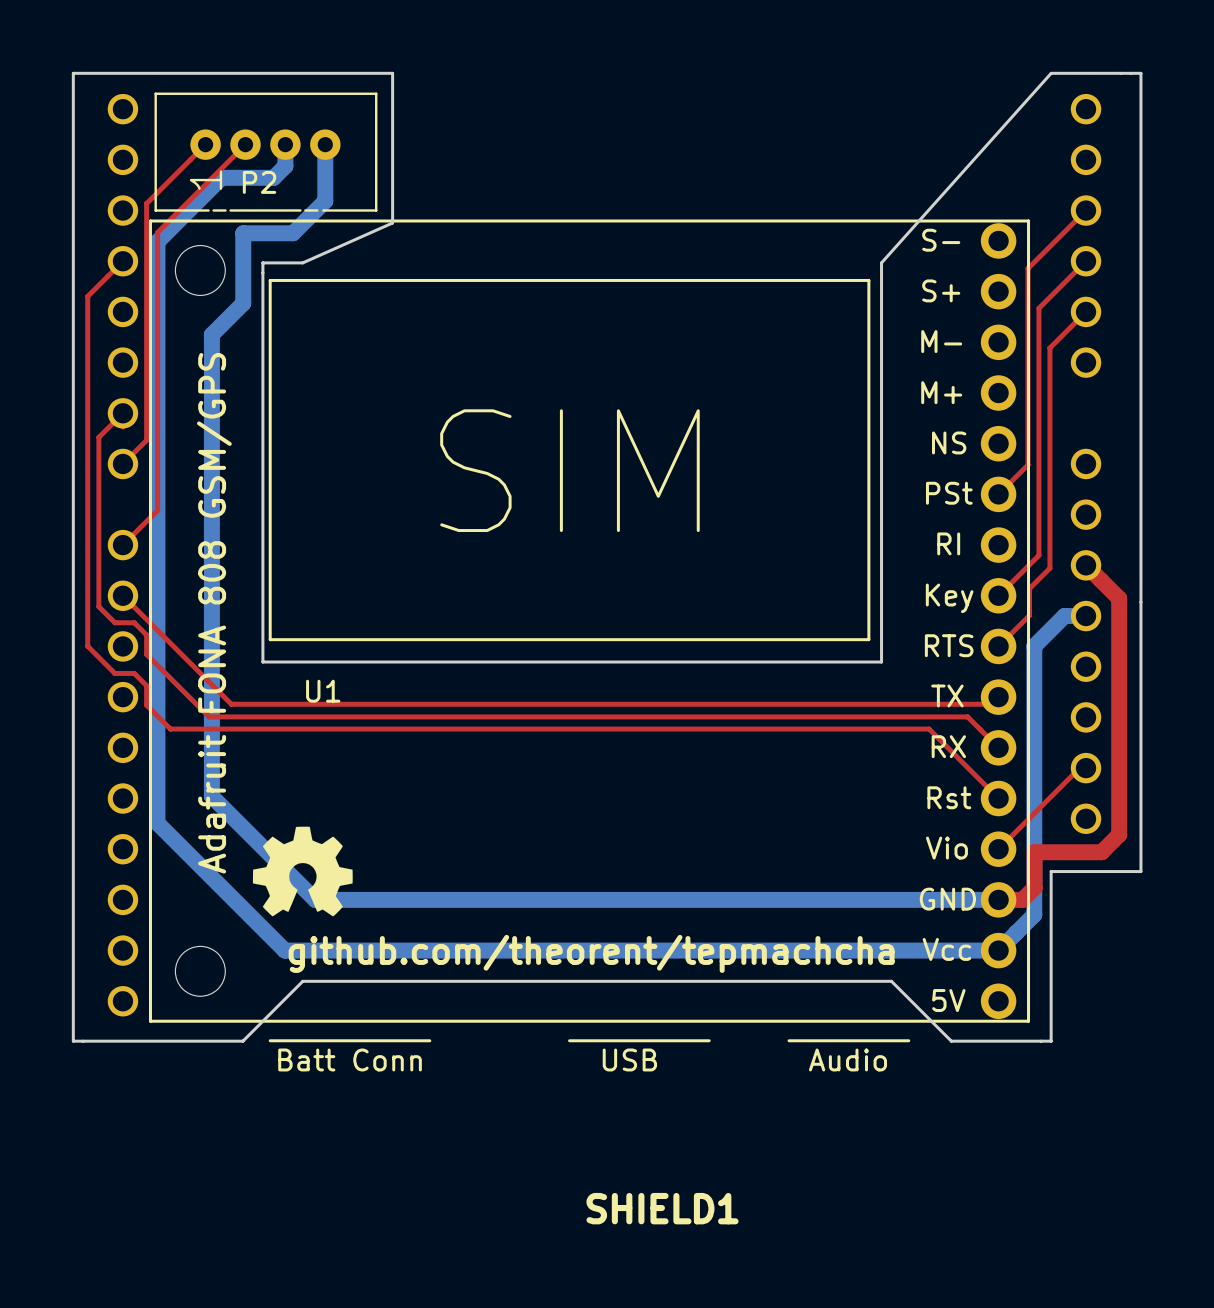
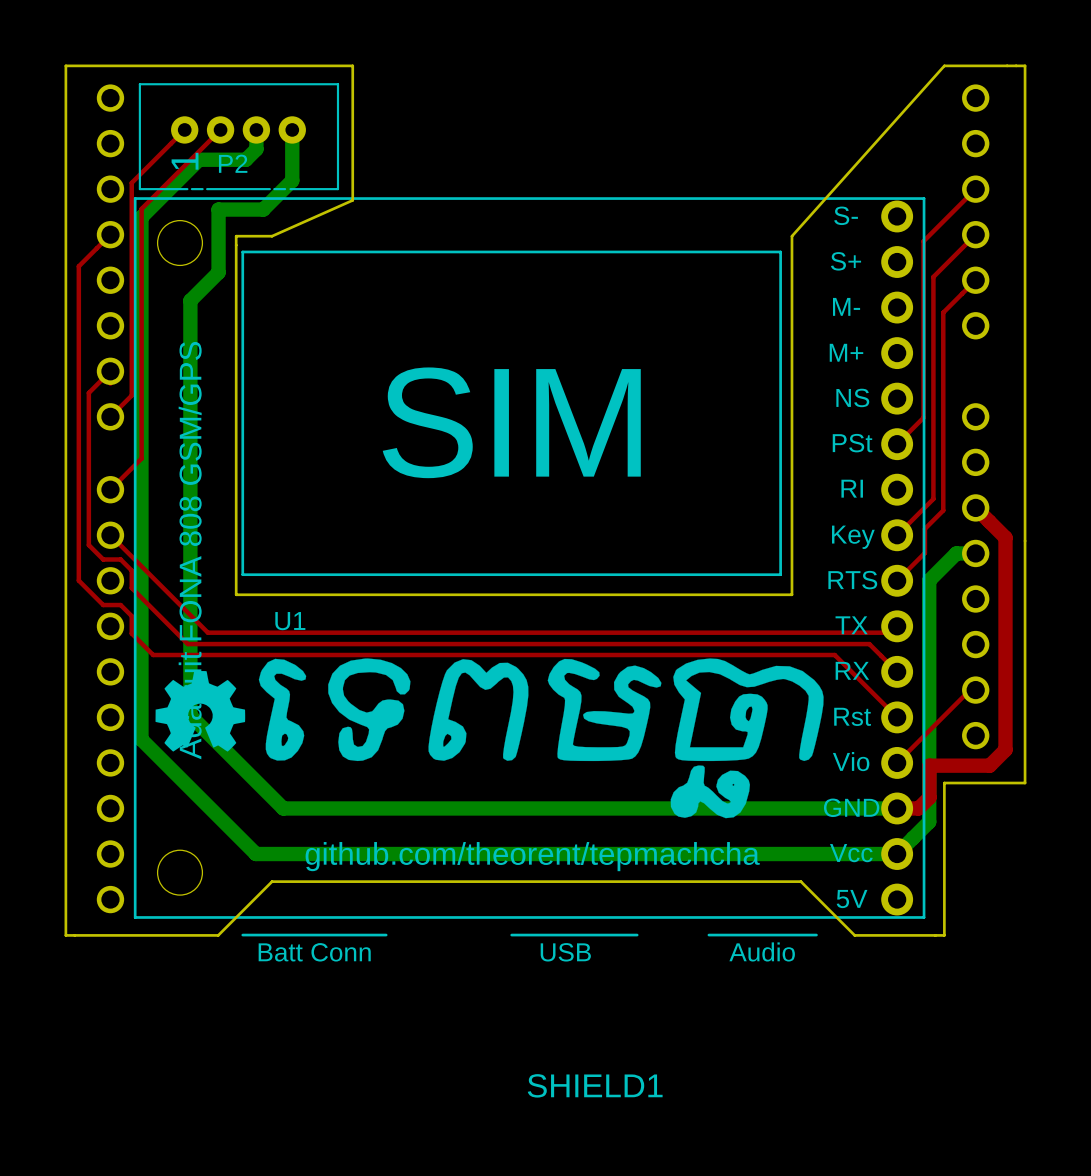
drawing: none -> [258, 658, 824, 819]
drawing position: (302, 871) -> (200, 711)

